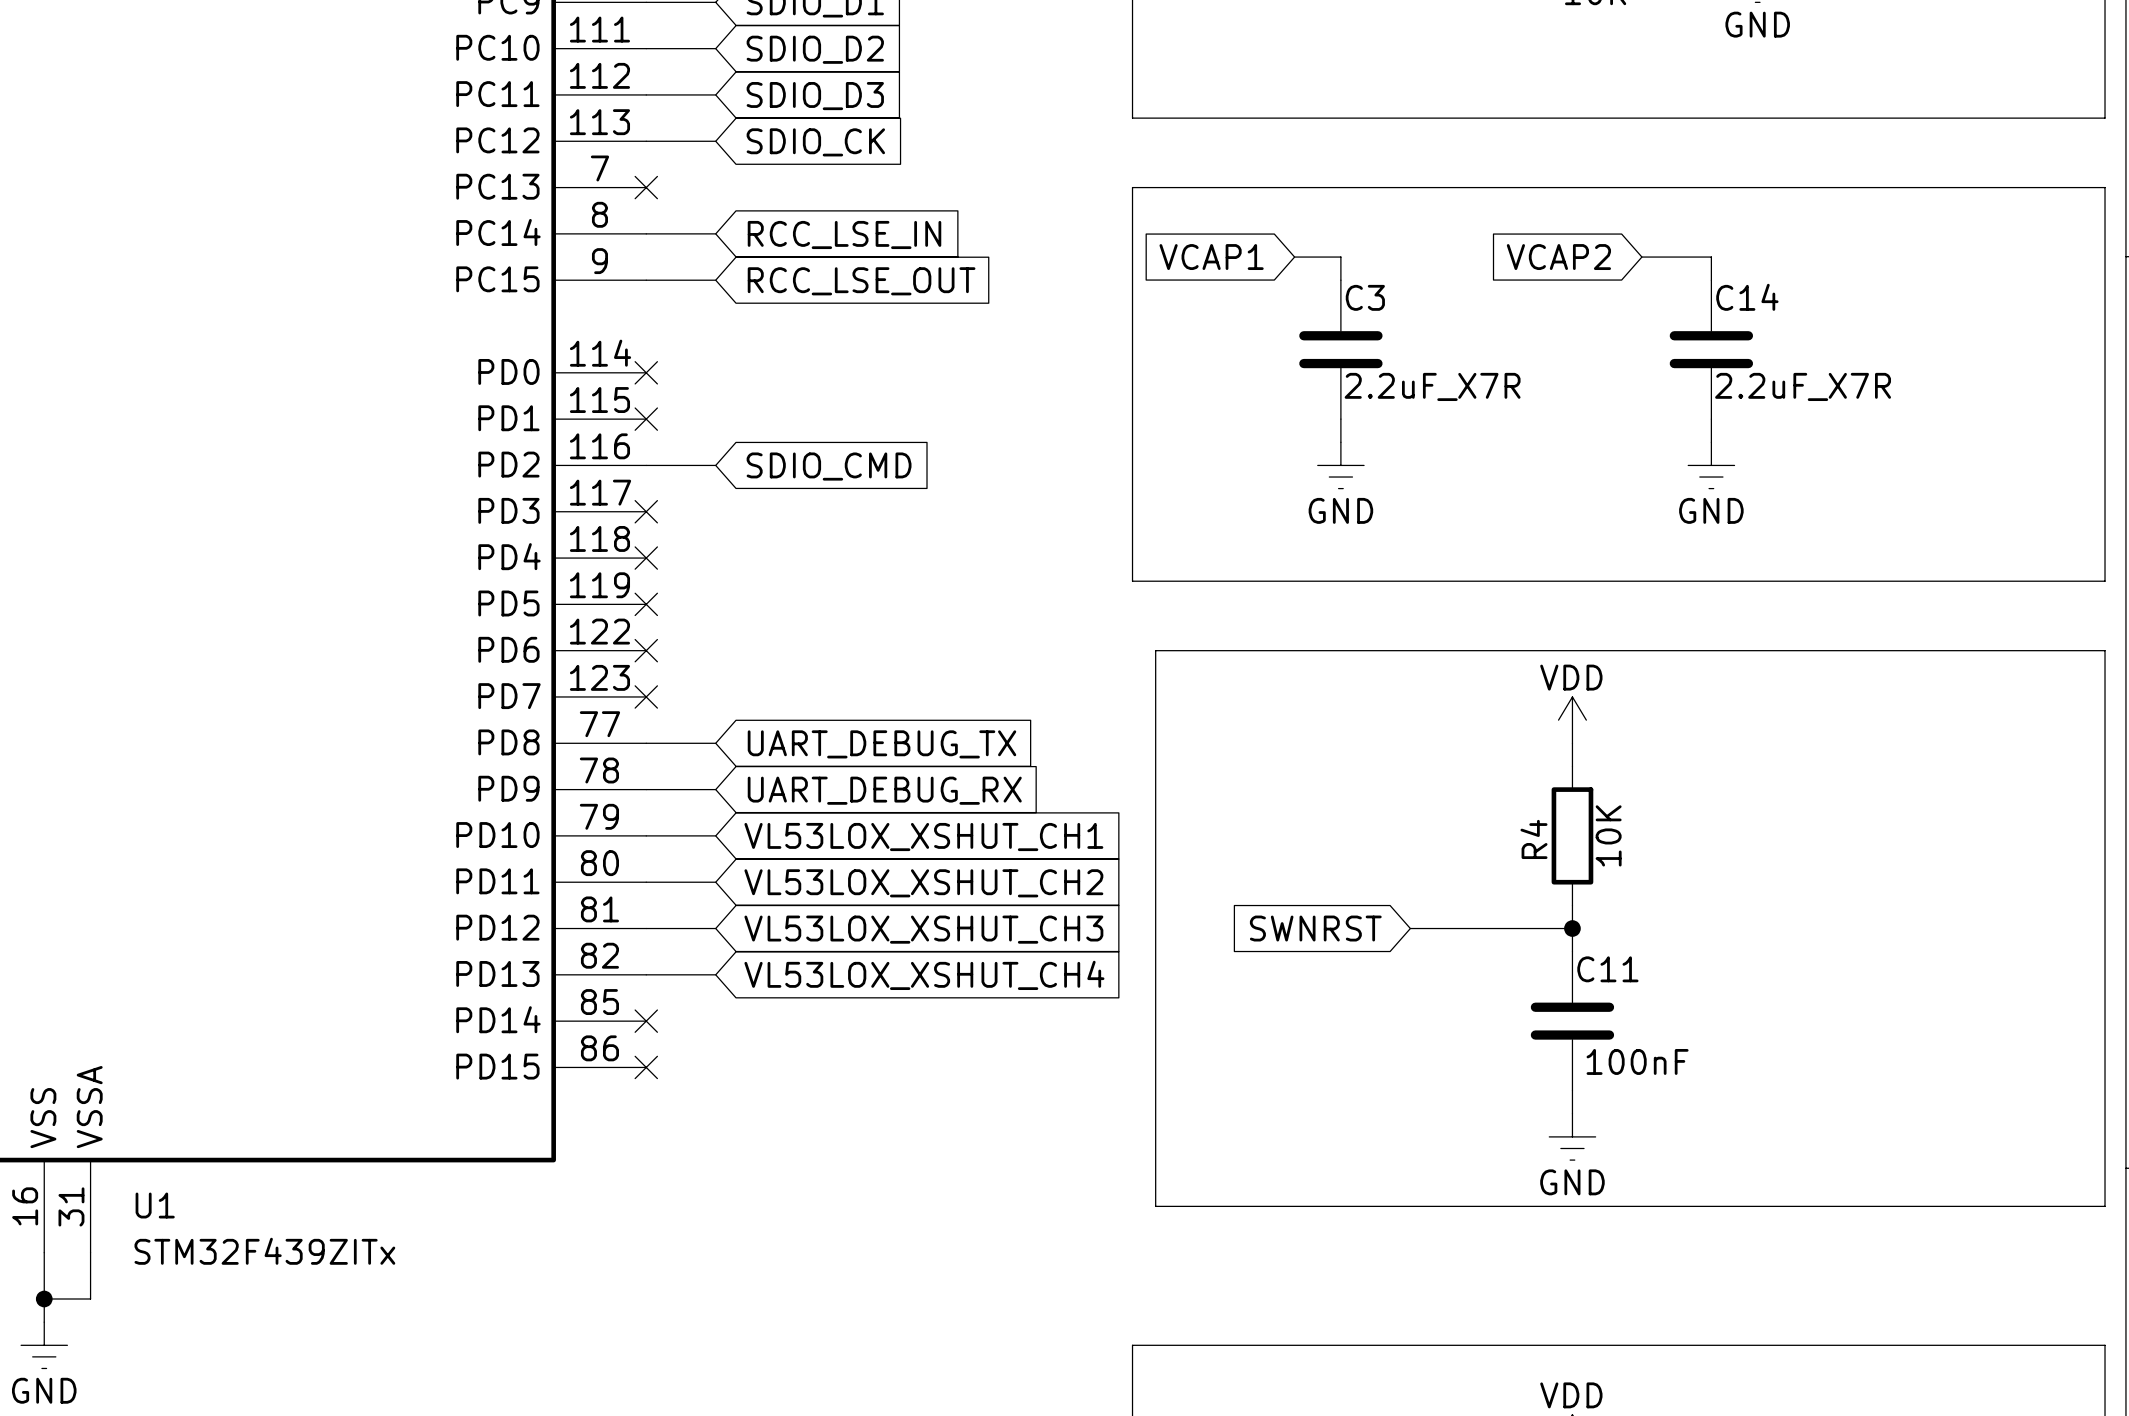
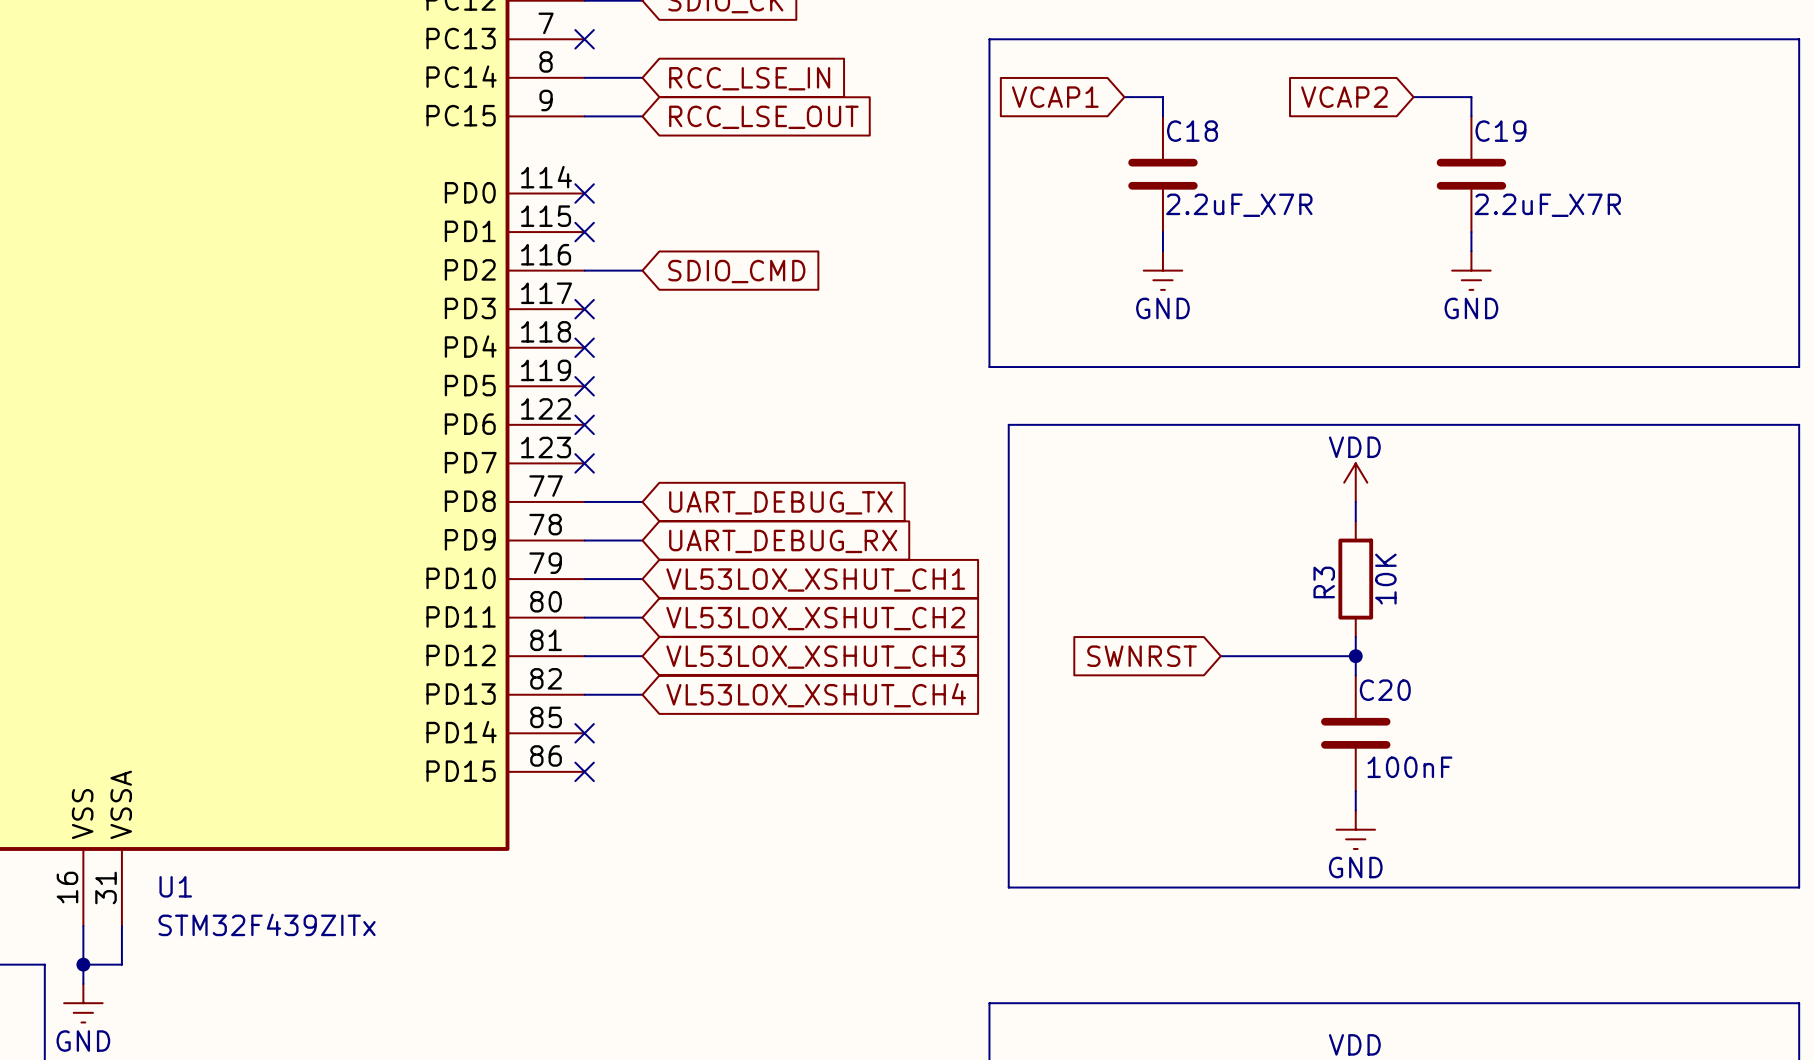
C3 name: C3 (1365, 297) -> C18 (1192, 131)
C14 name: C14 (1747, 297) -> C19 (1500, 131)
R4 name: R4 (1533, 839) -> R3 (1324, 582)
C11 name: C11 (1607, 969) -> C20 (1385, 690)

